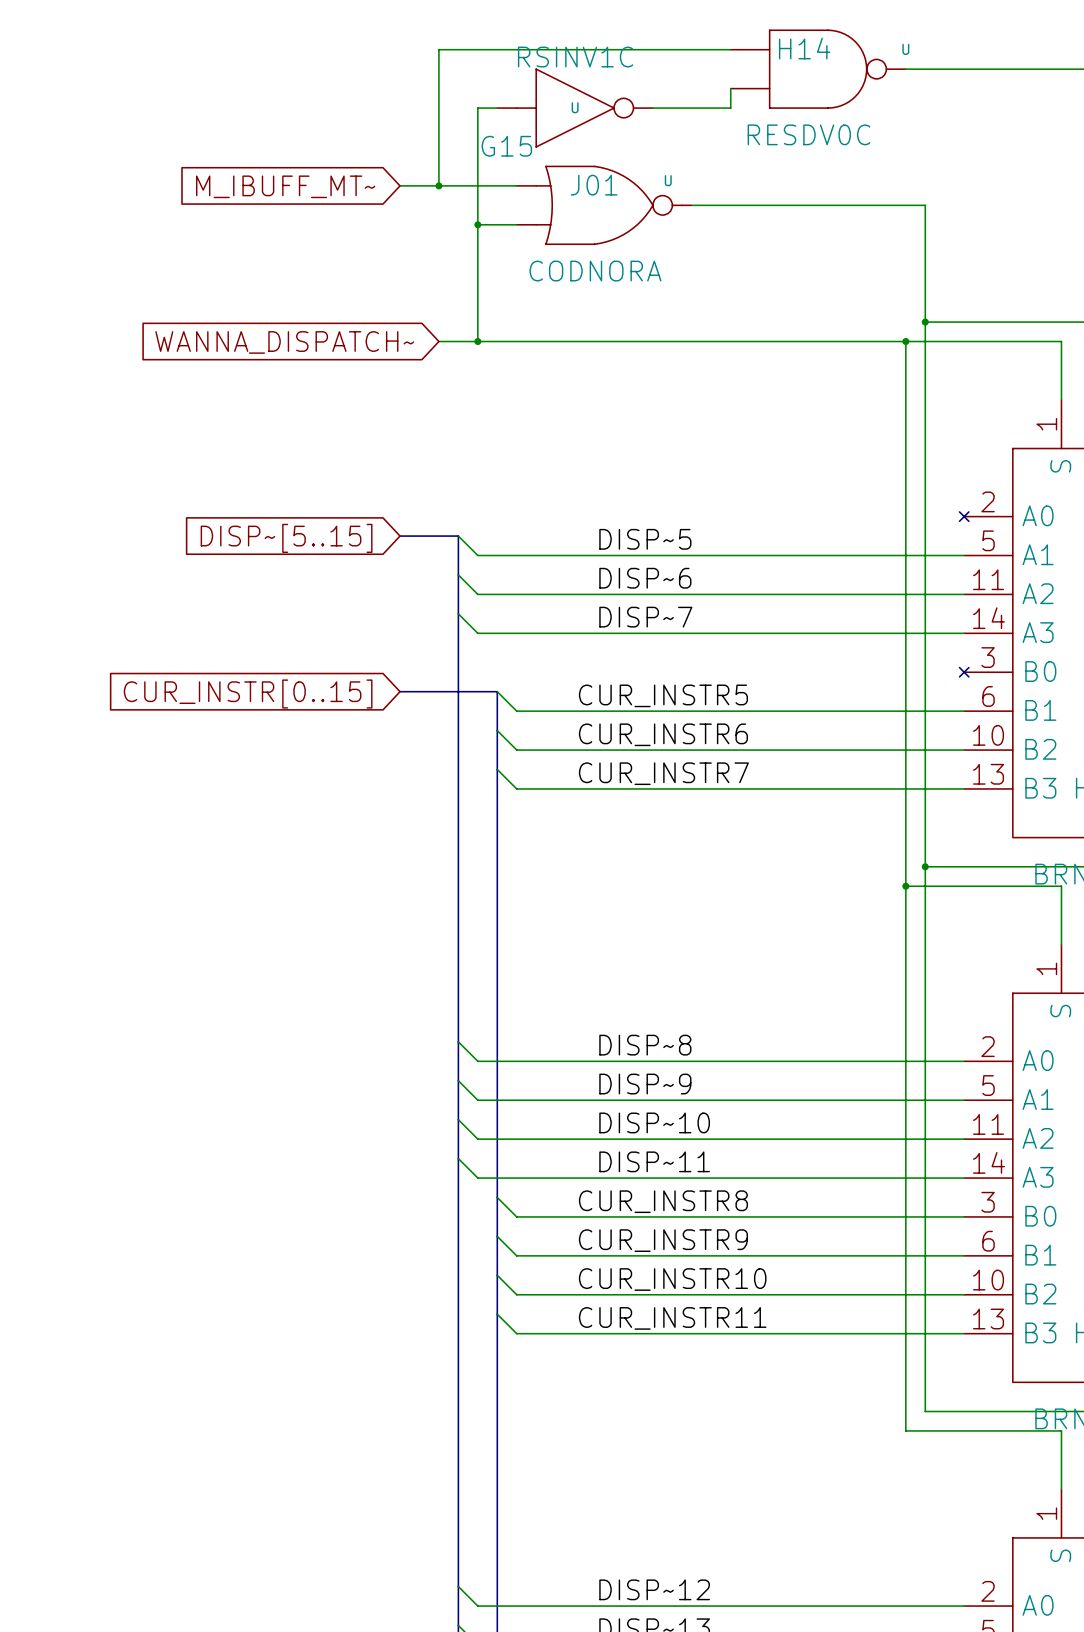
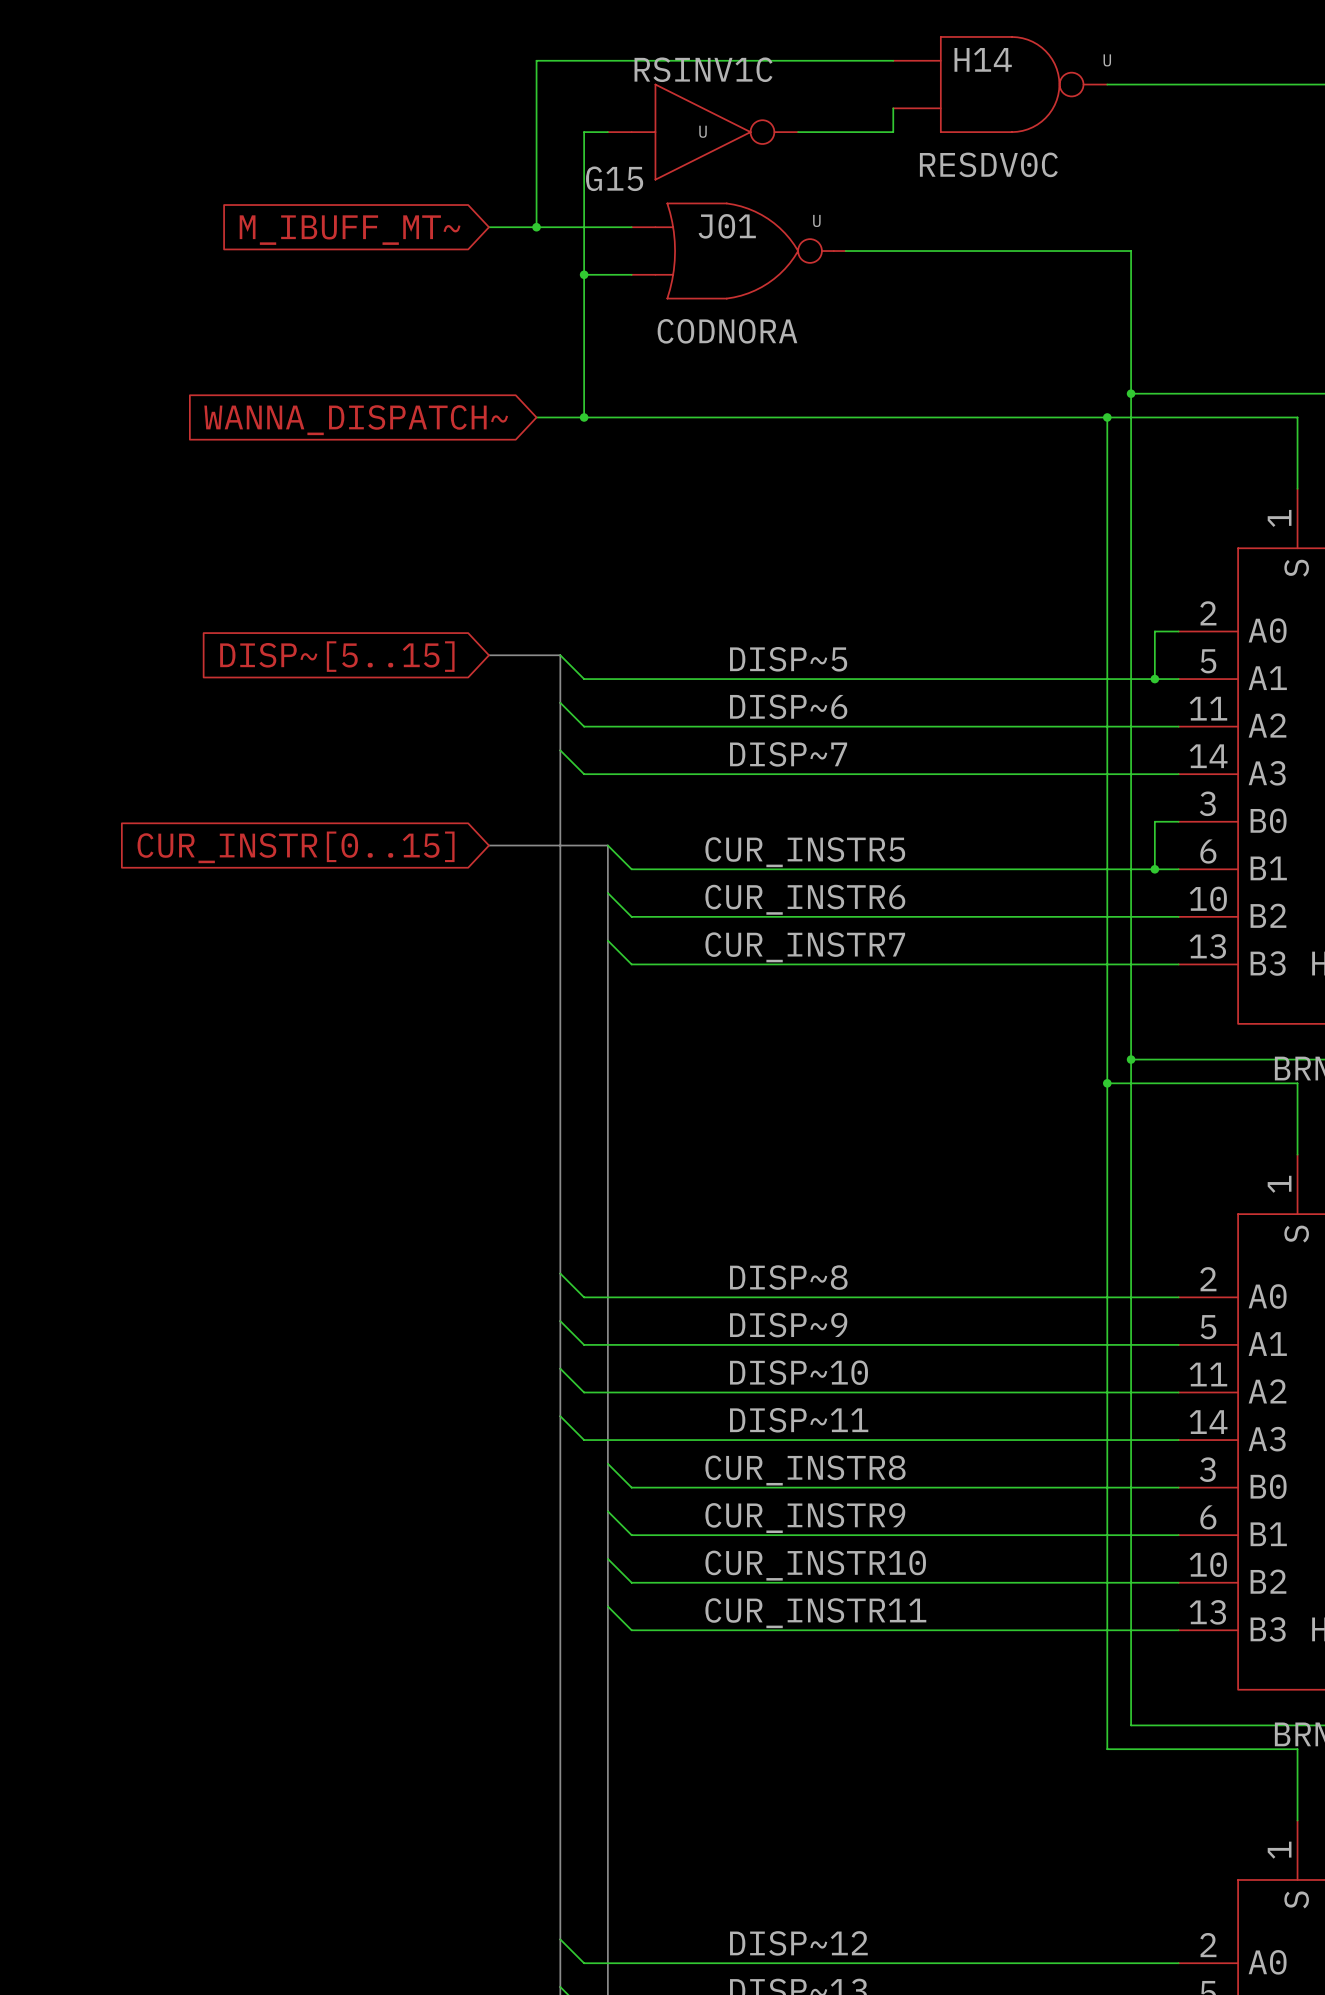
wire: none -> (1178, 631) (1154, 631) (1154, 679)
no-connect mark: (964, 516) -> none
junction: none -> (1154, 679)
wire: none -> (1178, 821) (1154, 821) (1154, 869)
no-connect mark: (964, 672) -> none
junction: none -> (1154, 869)

